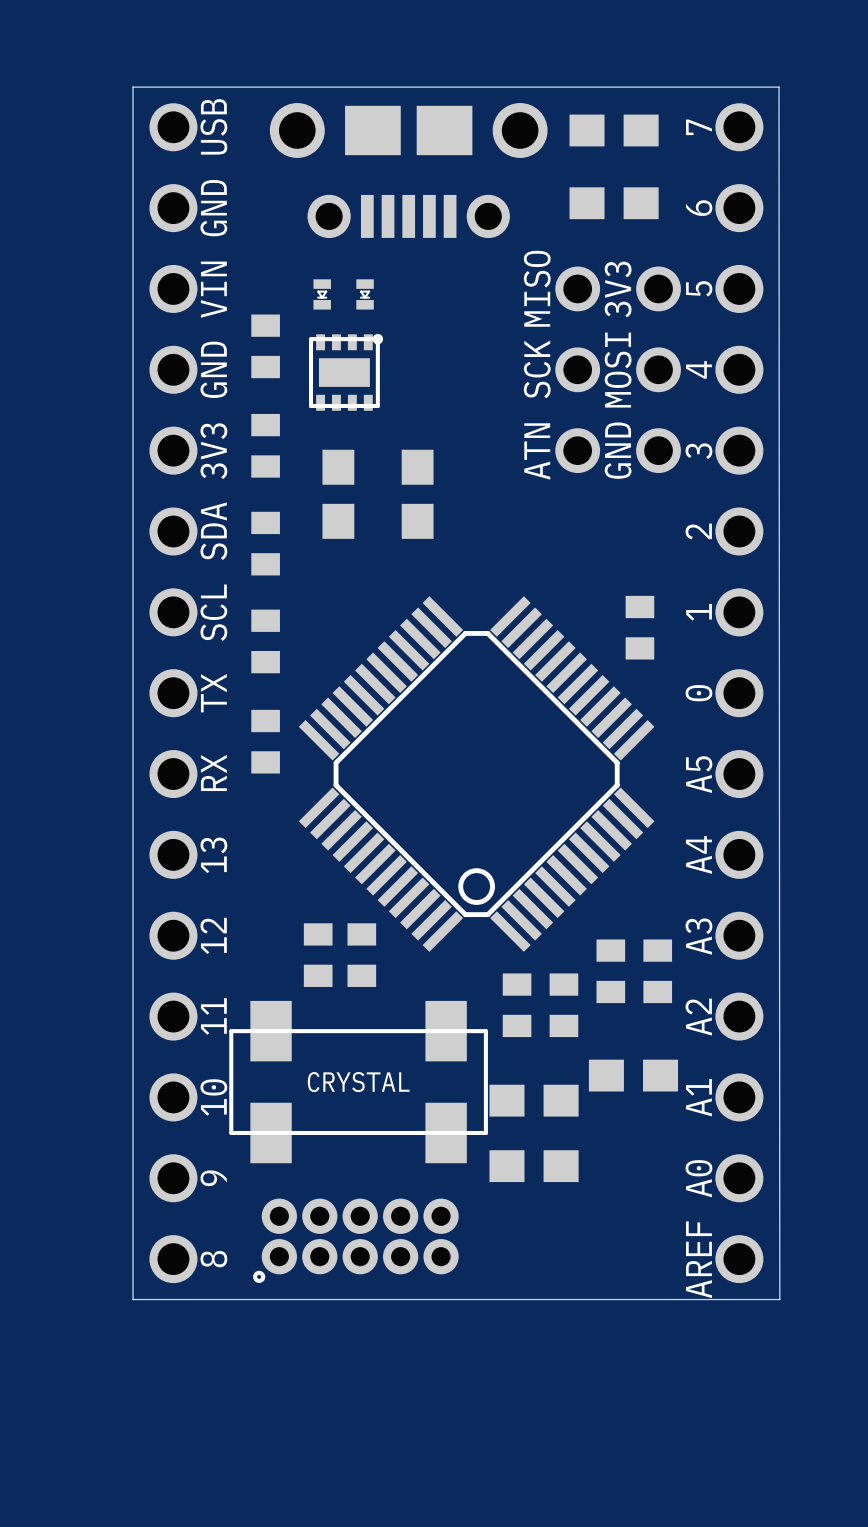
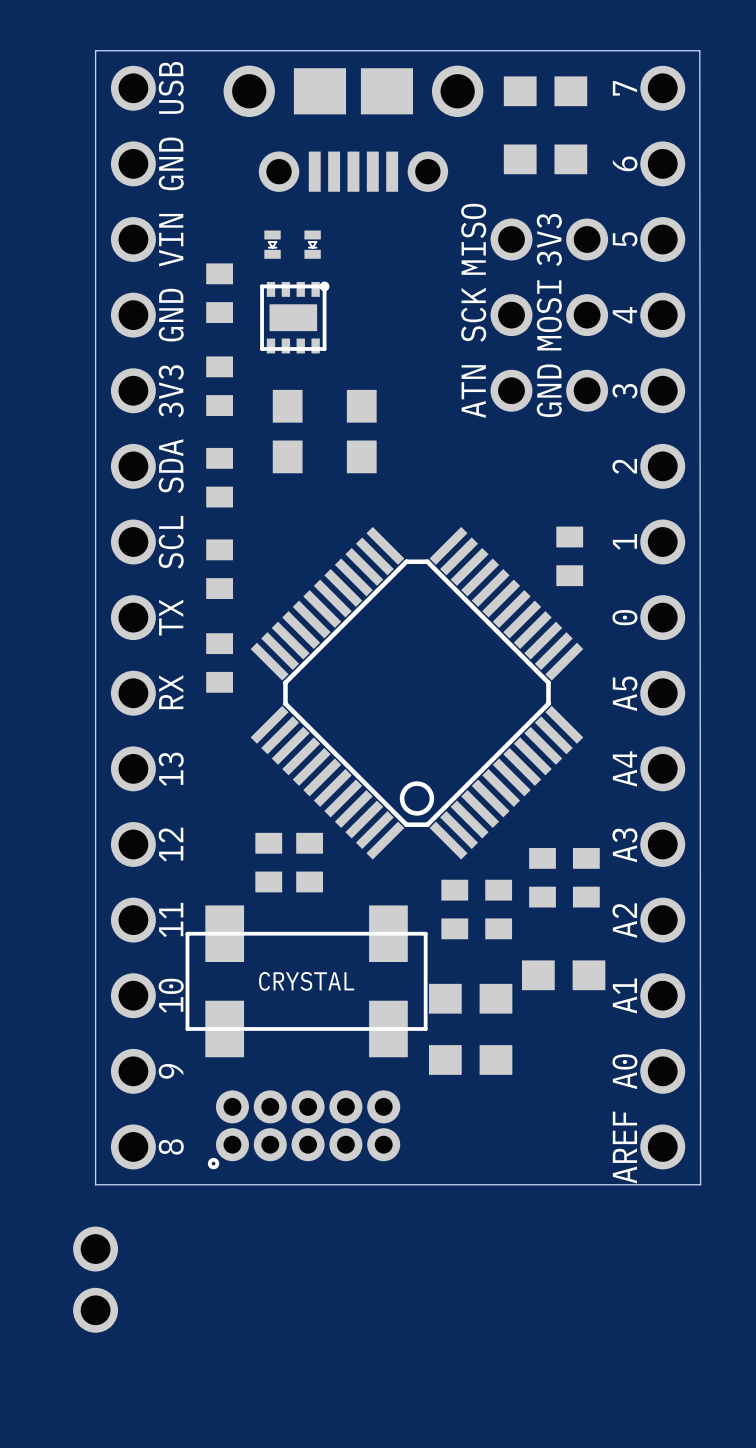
part: none -> (95, 1249)
part: none -> (95, 1310)

